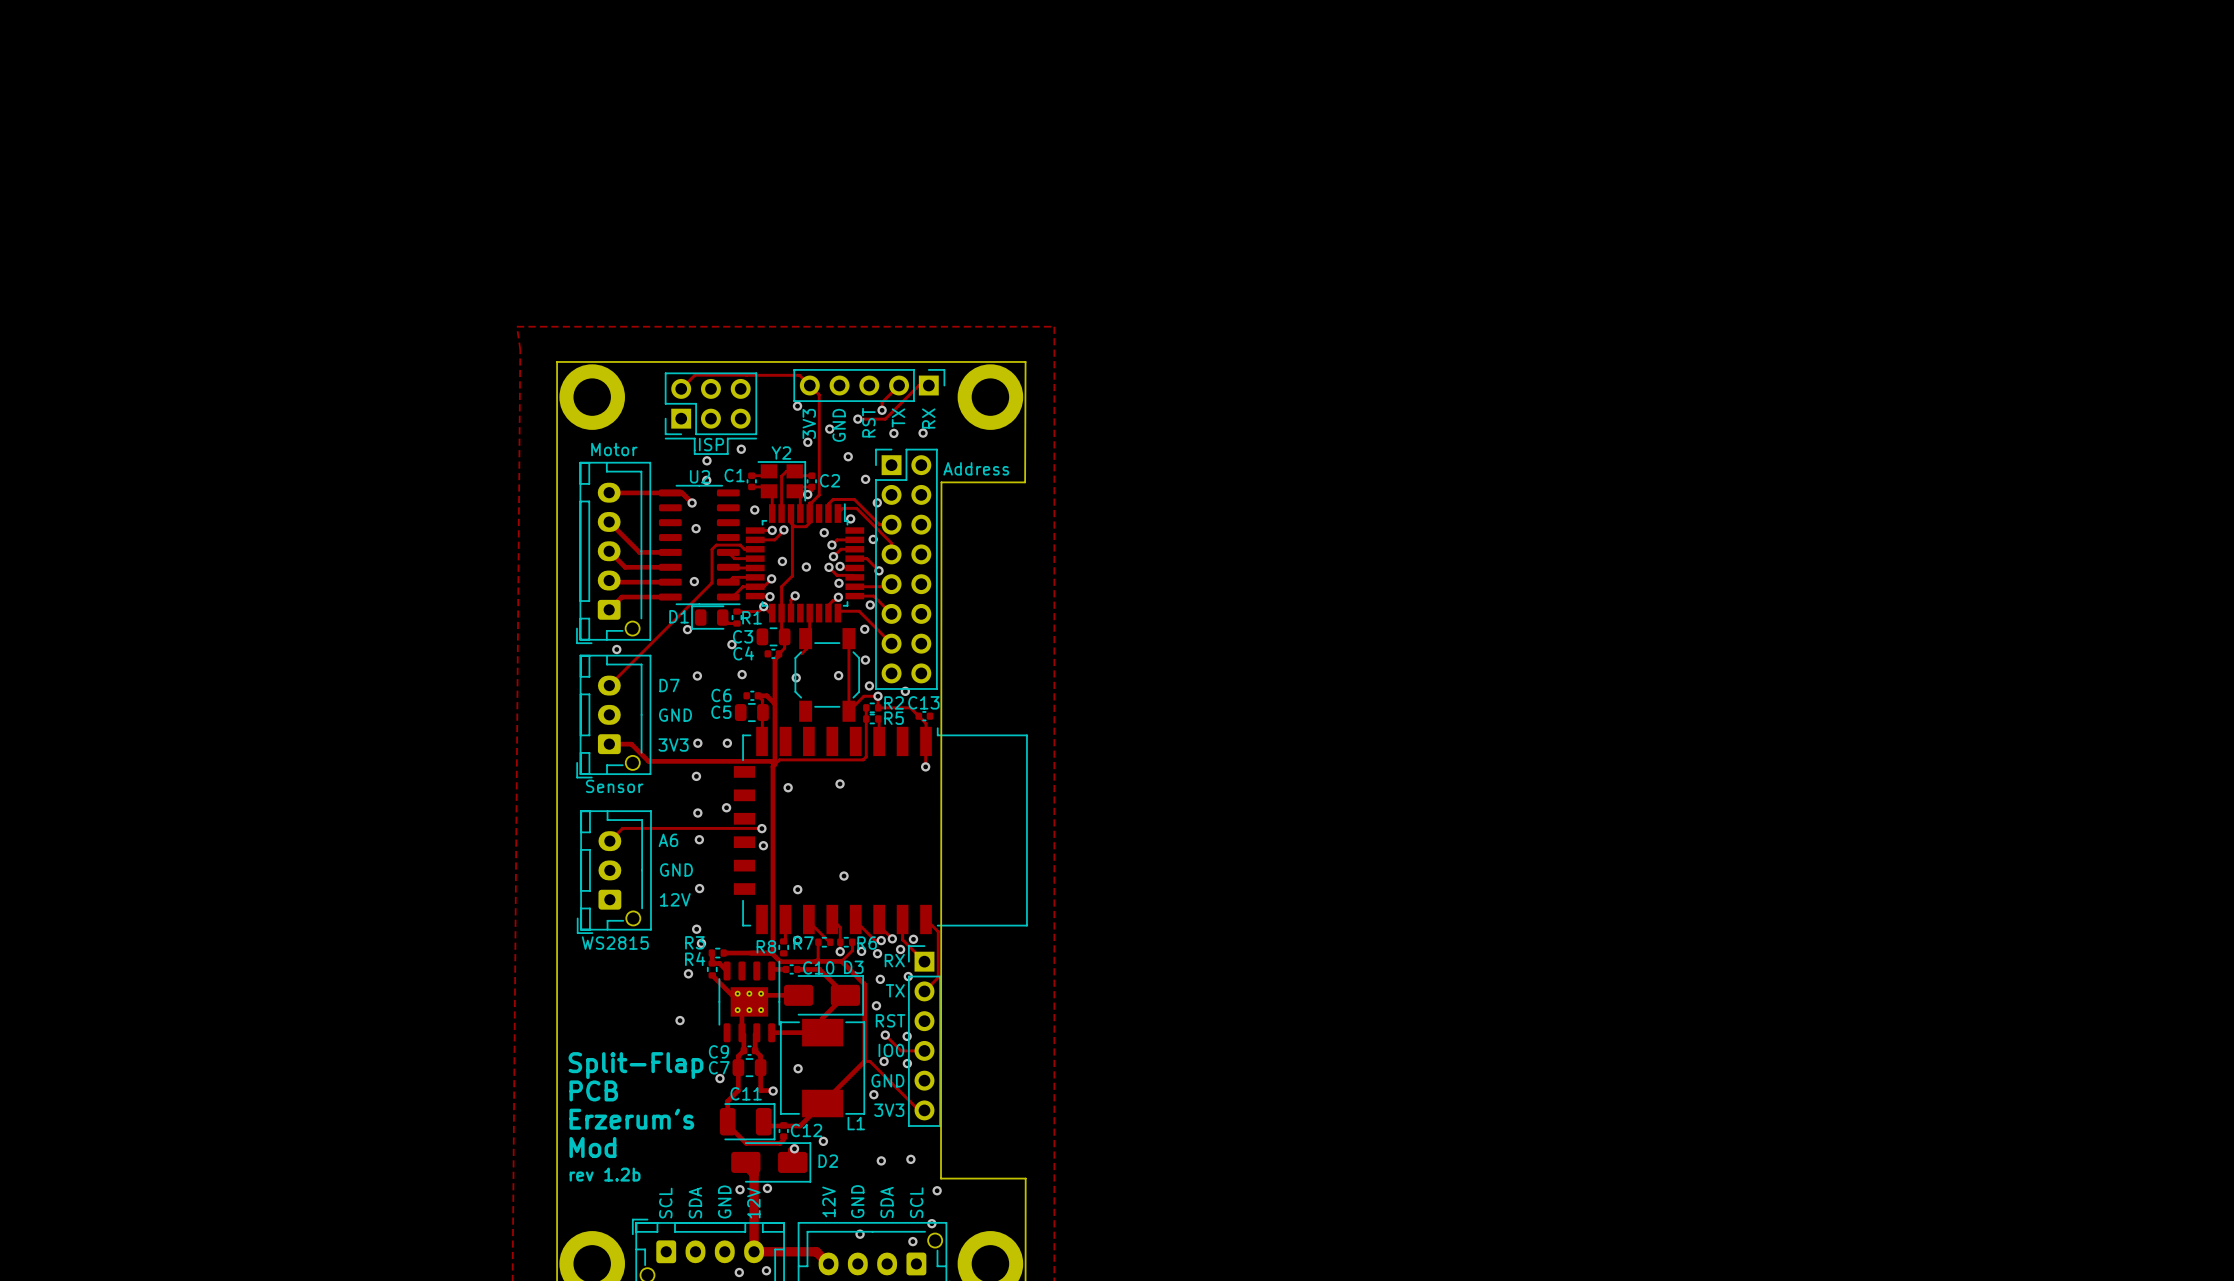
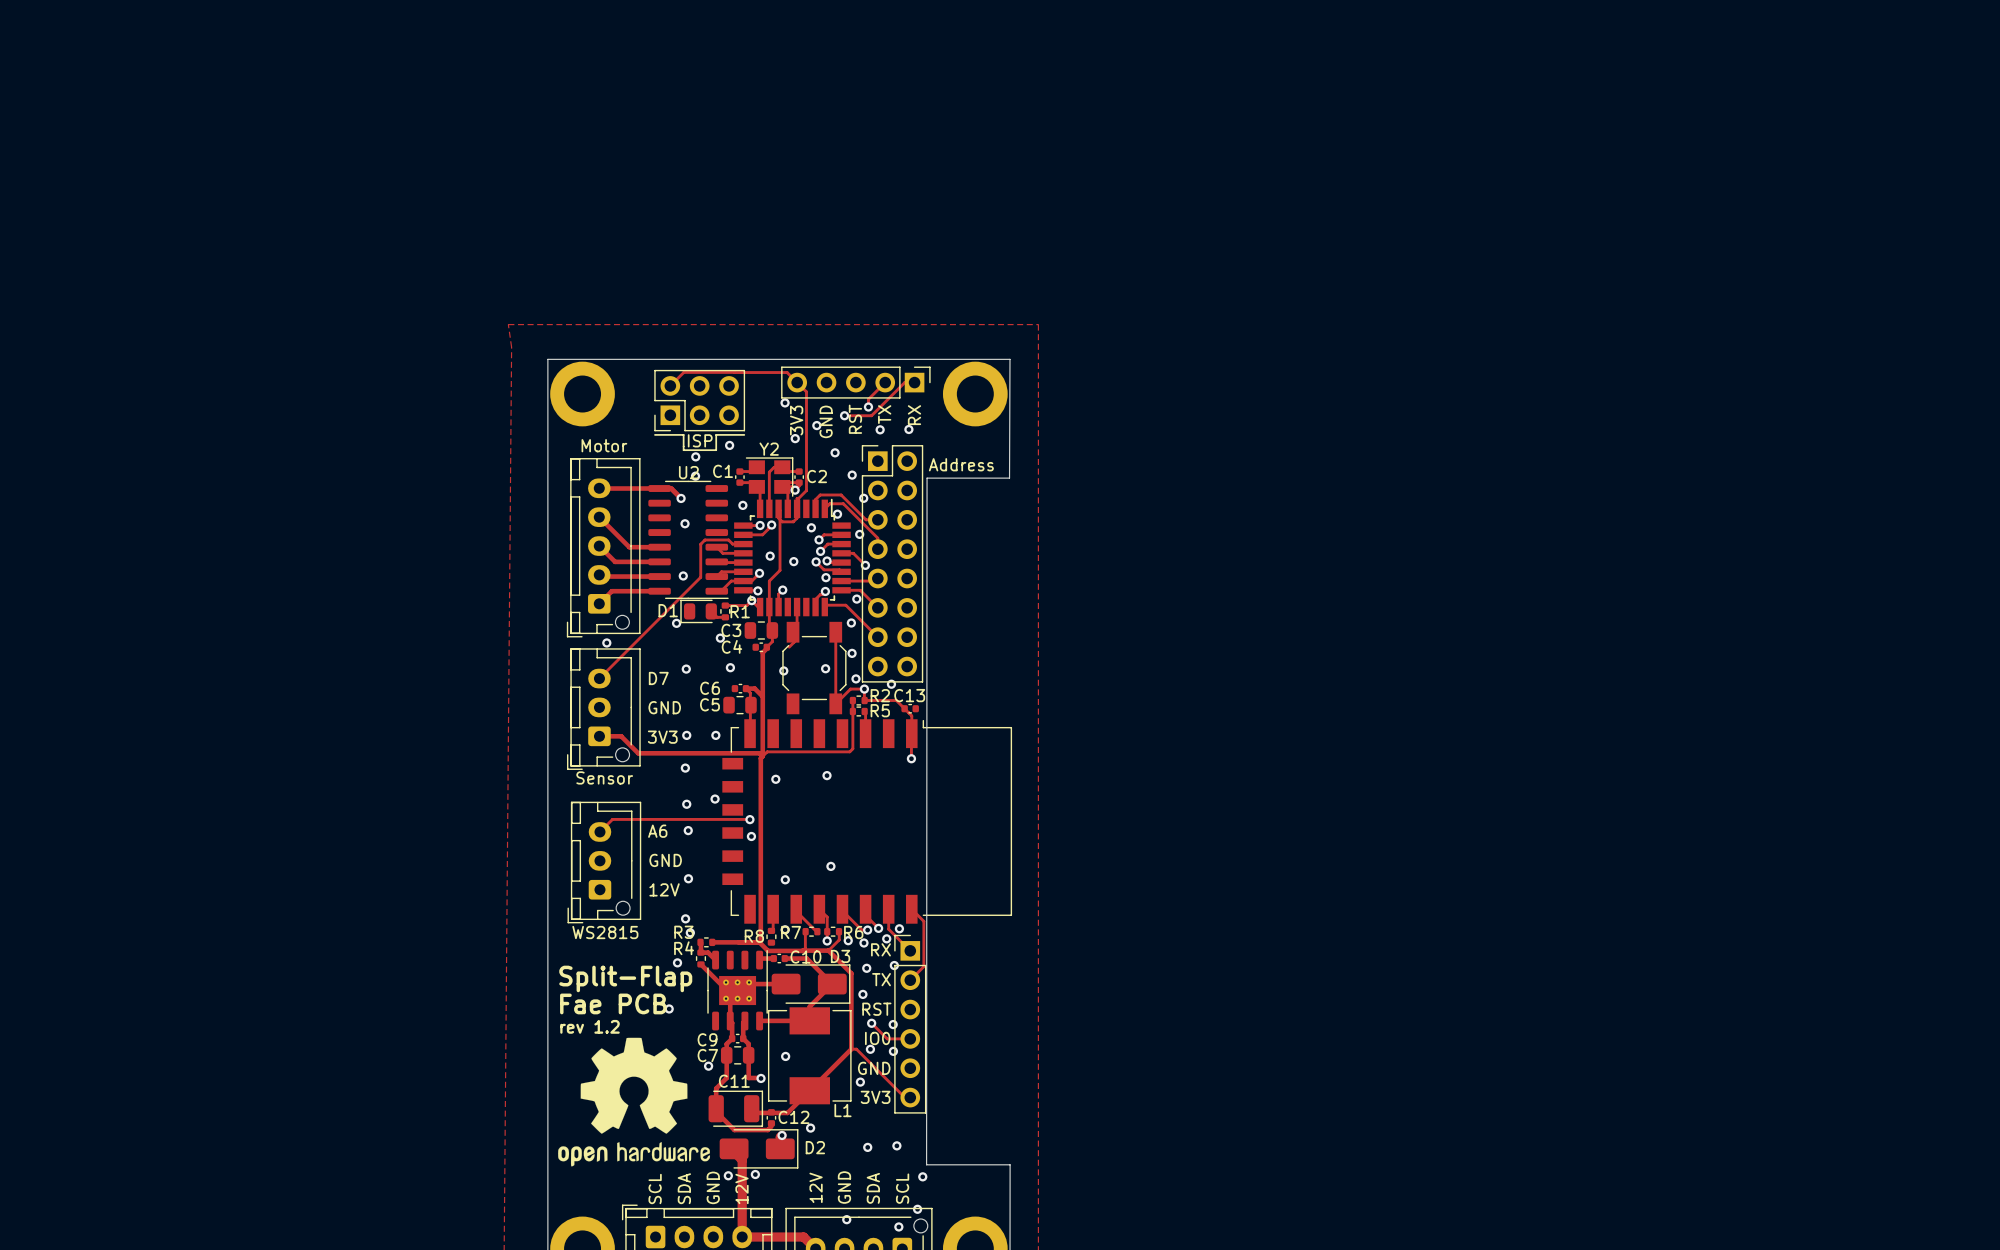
text: none -> Fae PCB (613, 1003)
text: none -> rev 1.2 (590, 1026)
drawing: none -> [558, 1037, 711, 1167]
text position: Split-Flap (636, 1065) -> Split-Flap (625, 978)
text: PCB (593, 1090) -> none
text: Erzerum's (631, 1119) -> none
text: Mod (592, 1147) -> none
text: rev 1.2b (605, 1174) -> none

